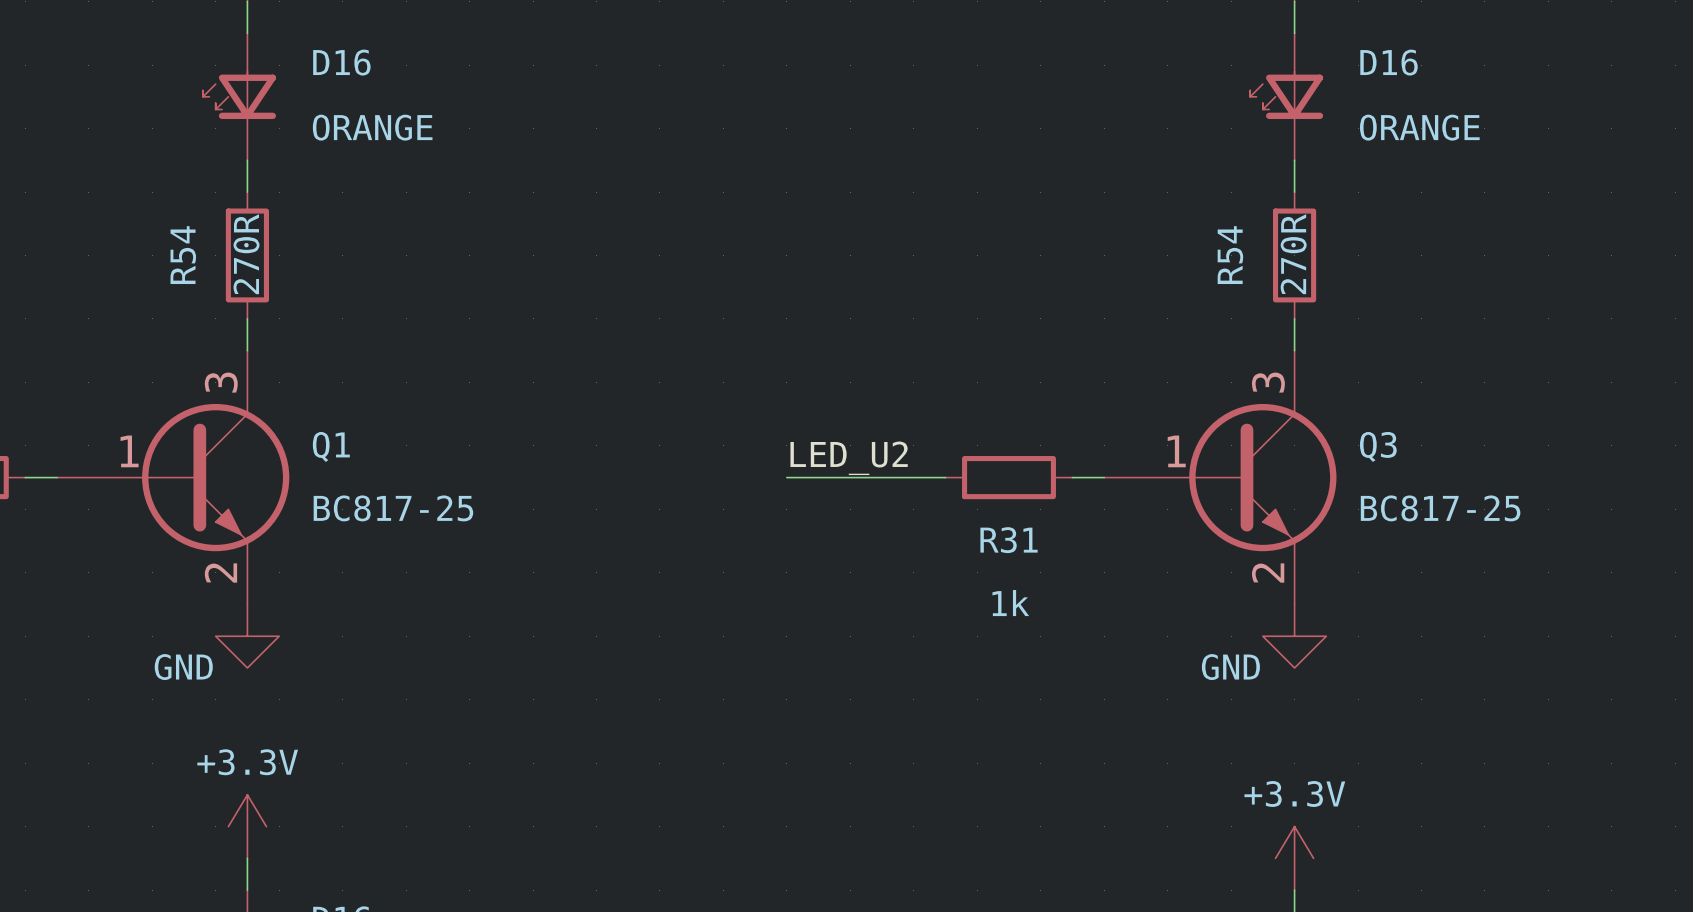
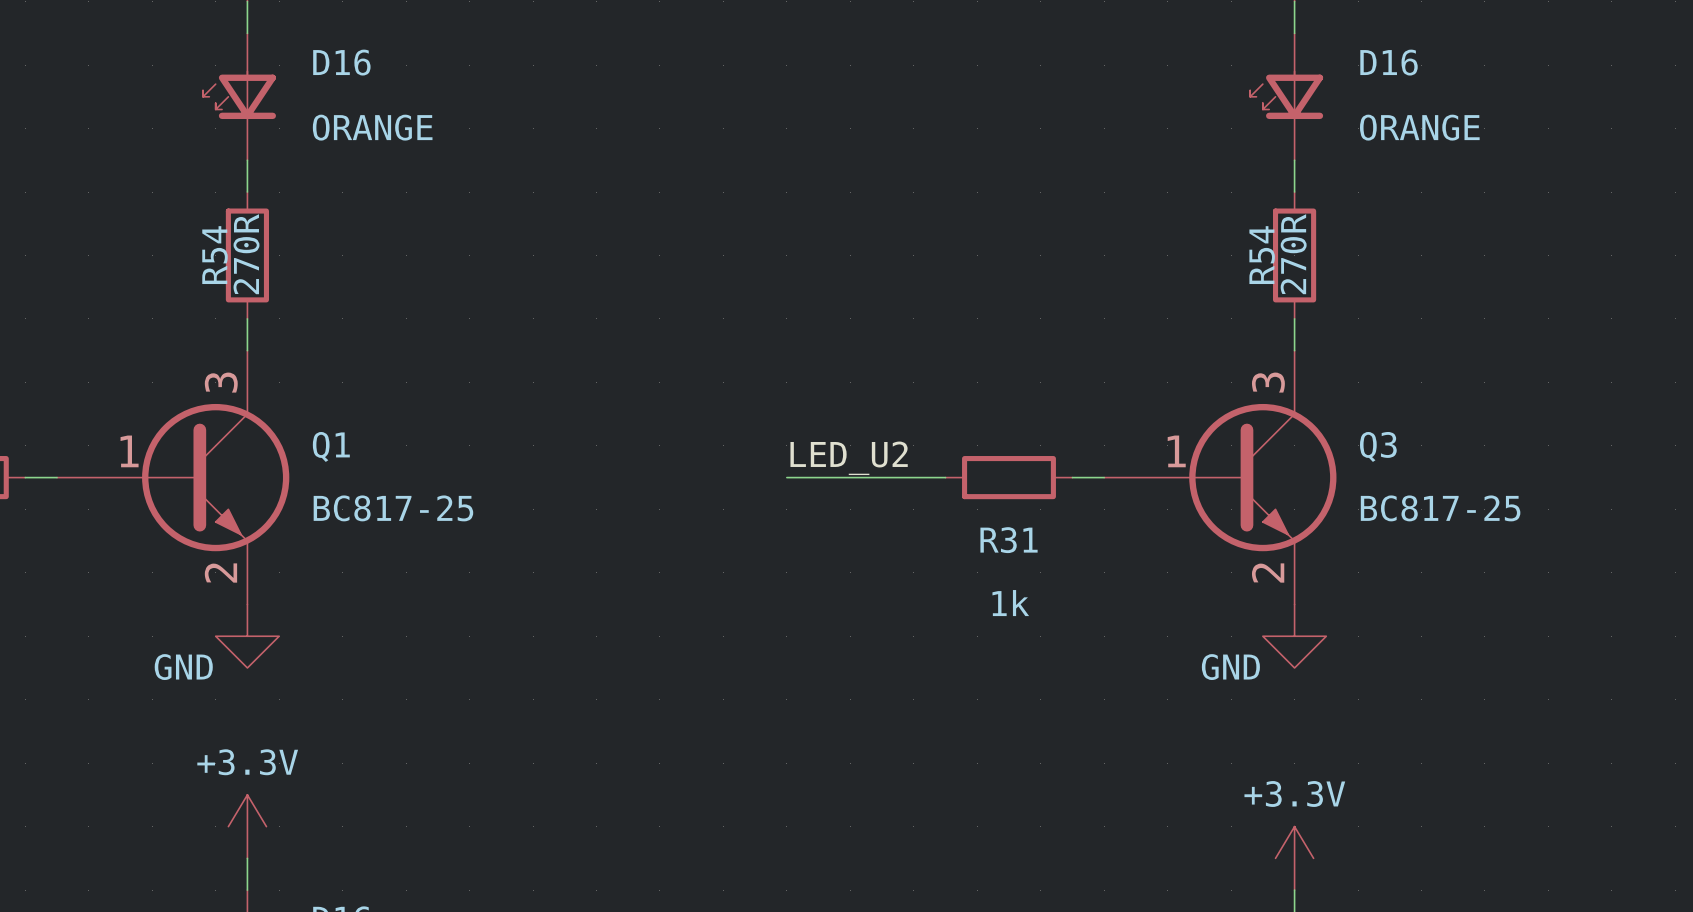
R54 name position: R54 (183, 255) -> R54 (215, 255)
R54 name position: R54 (1230, 255) -> R54 (1262, 255)

